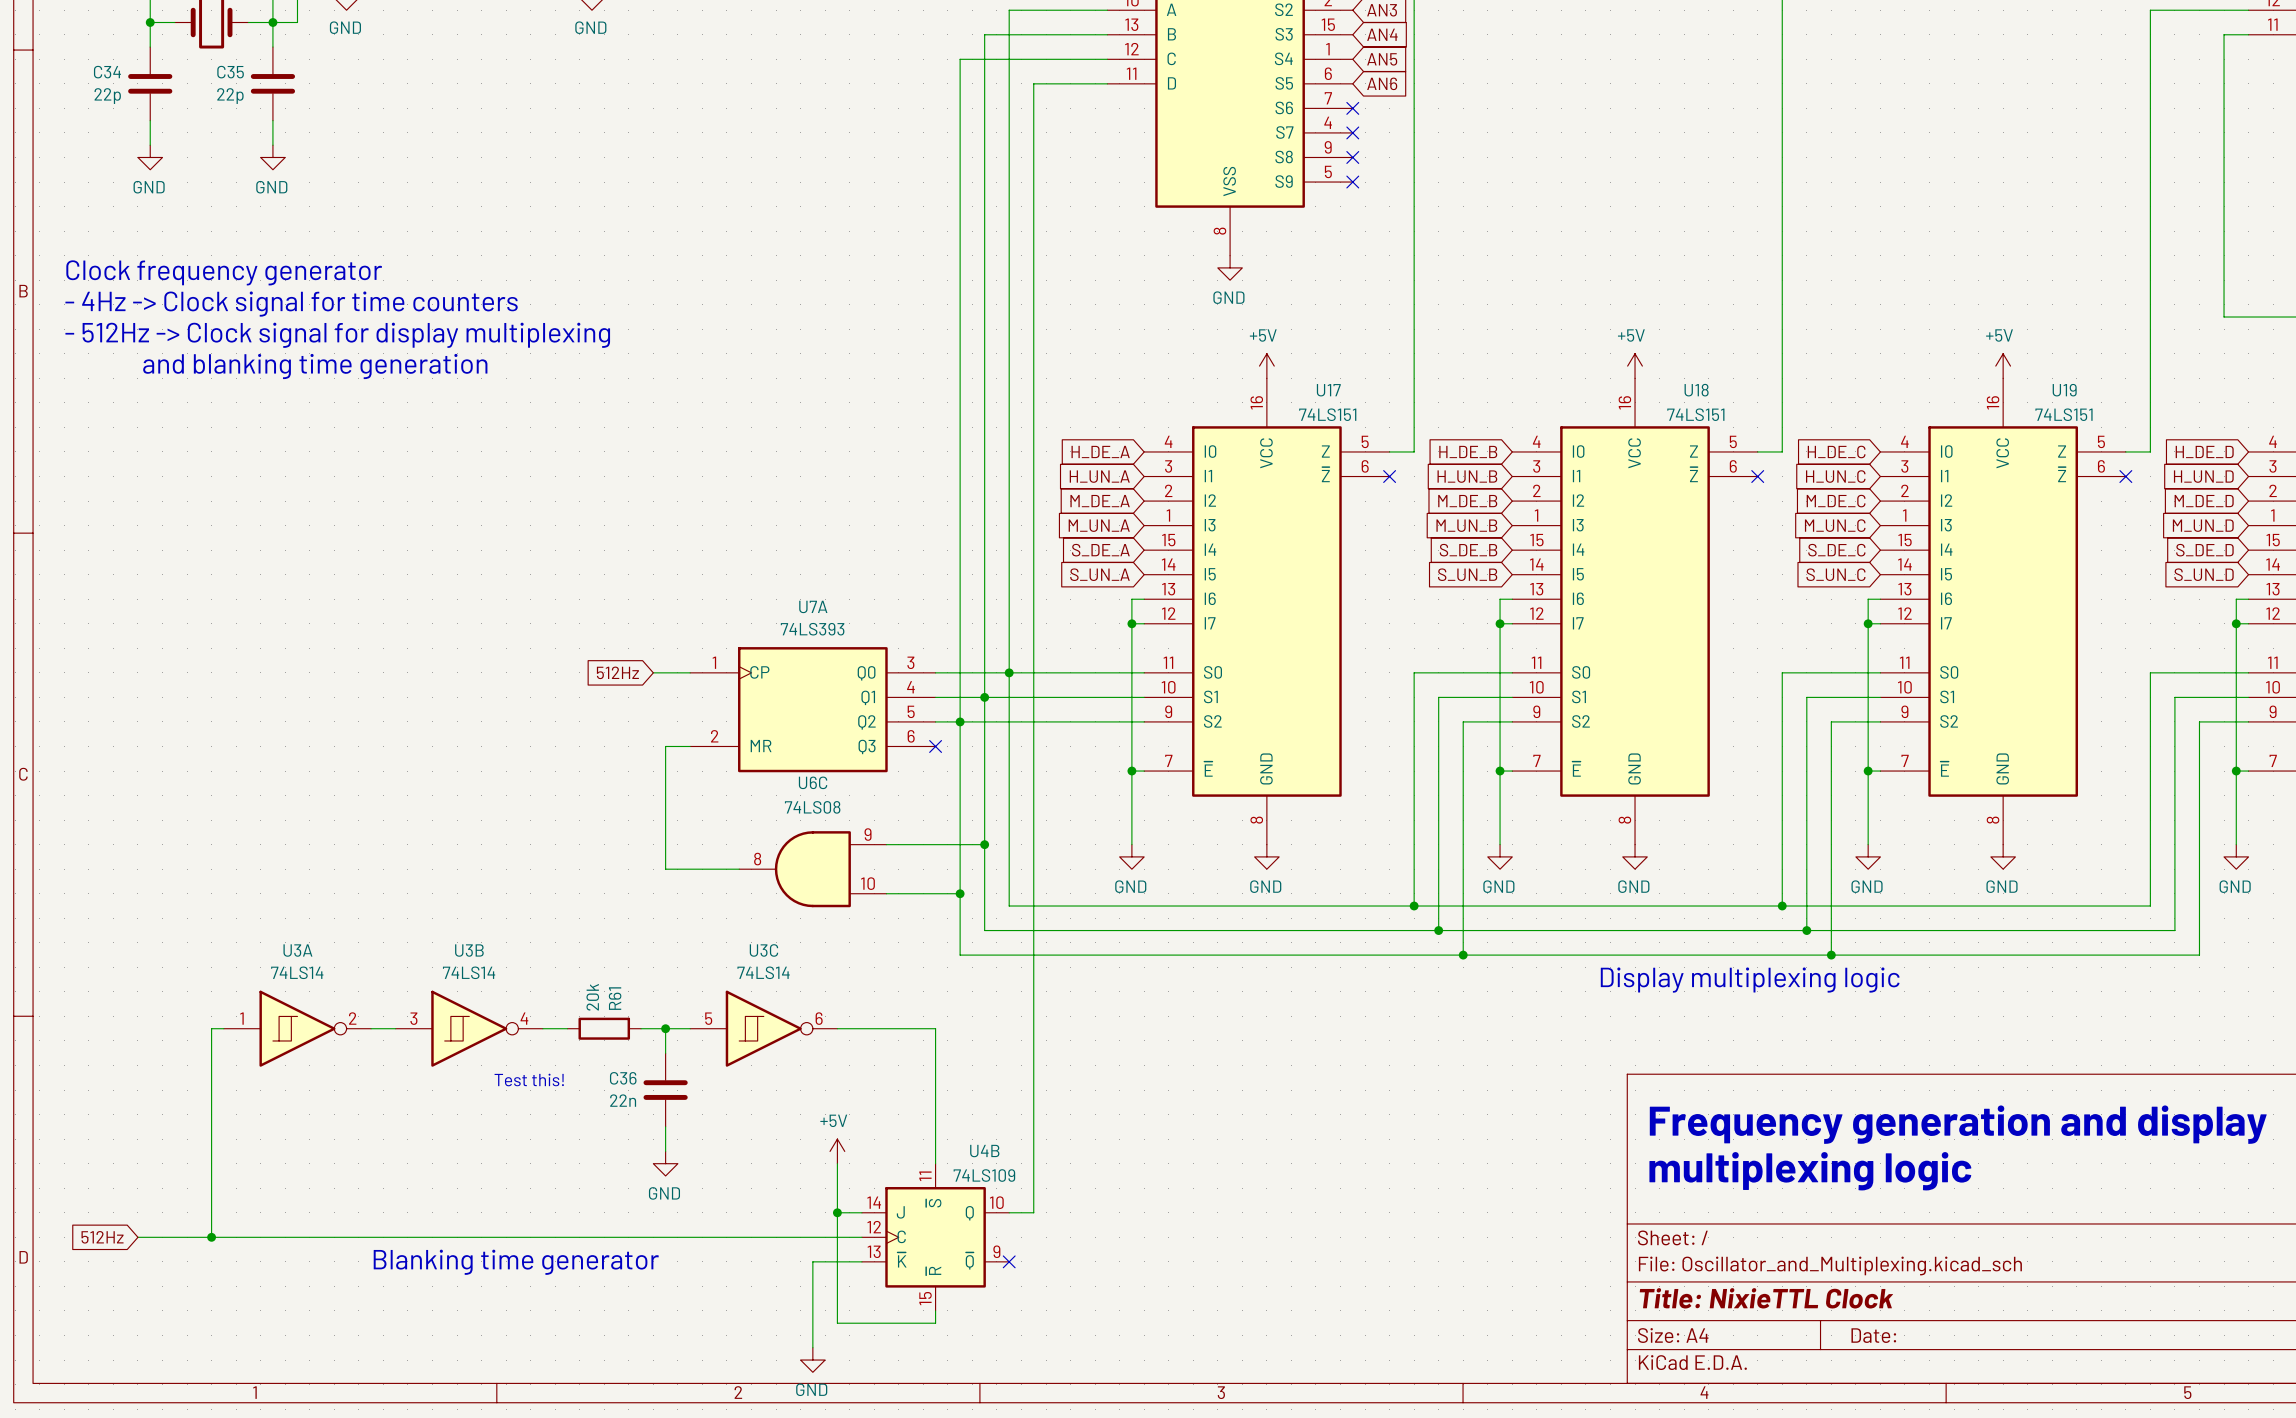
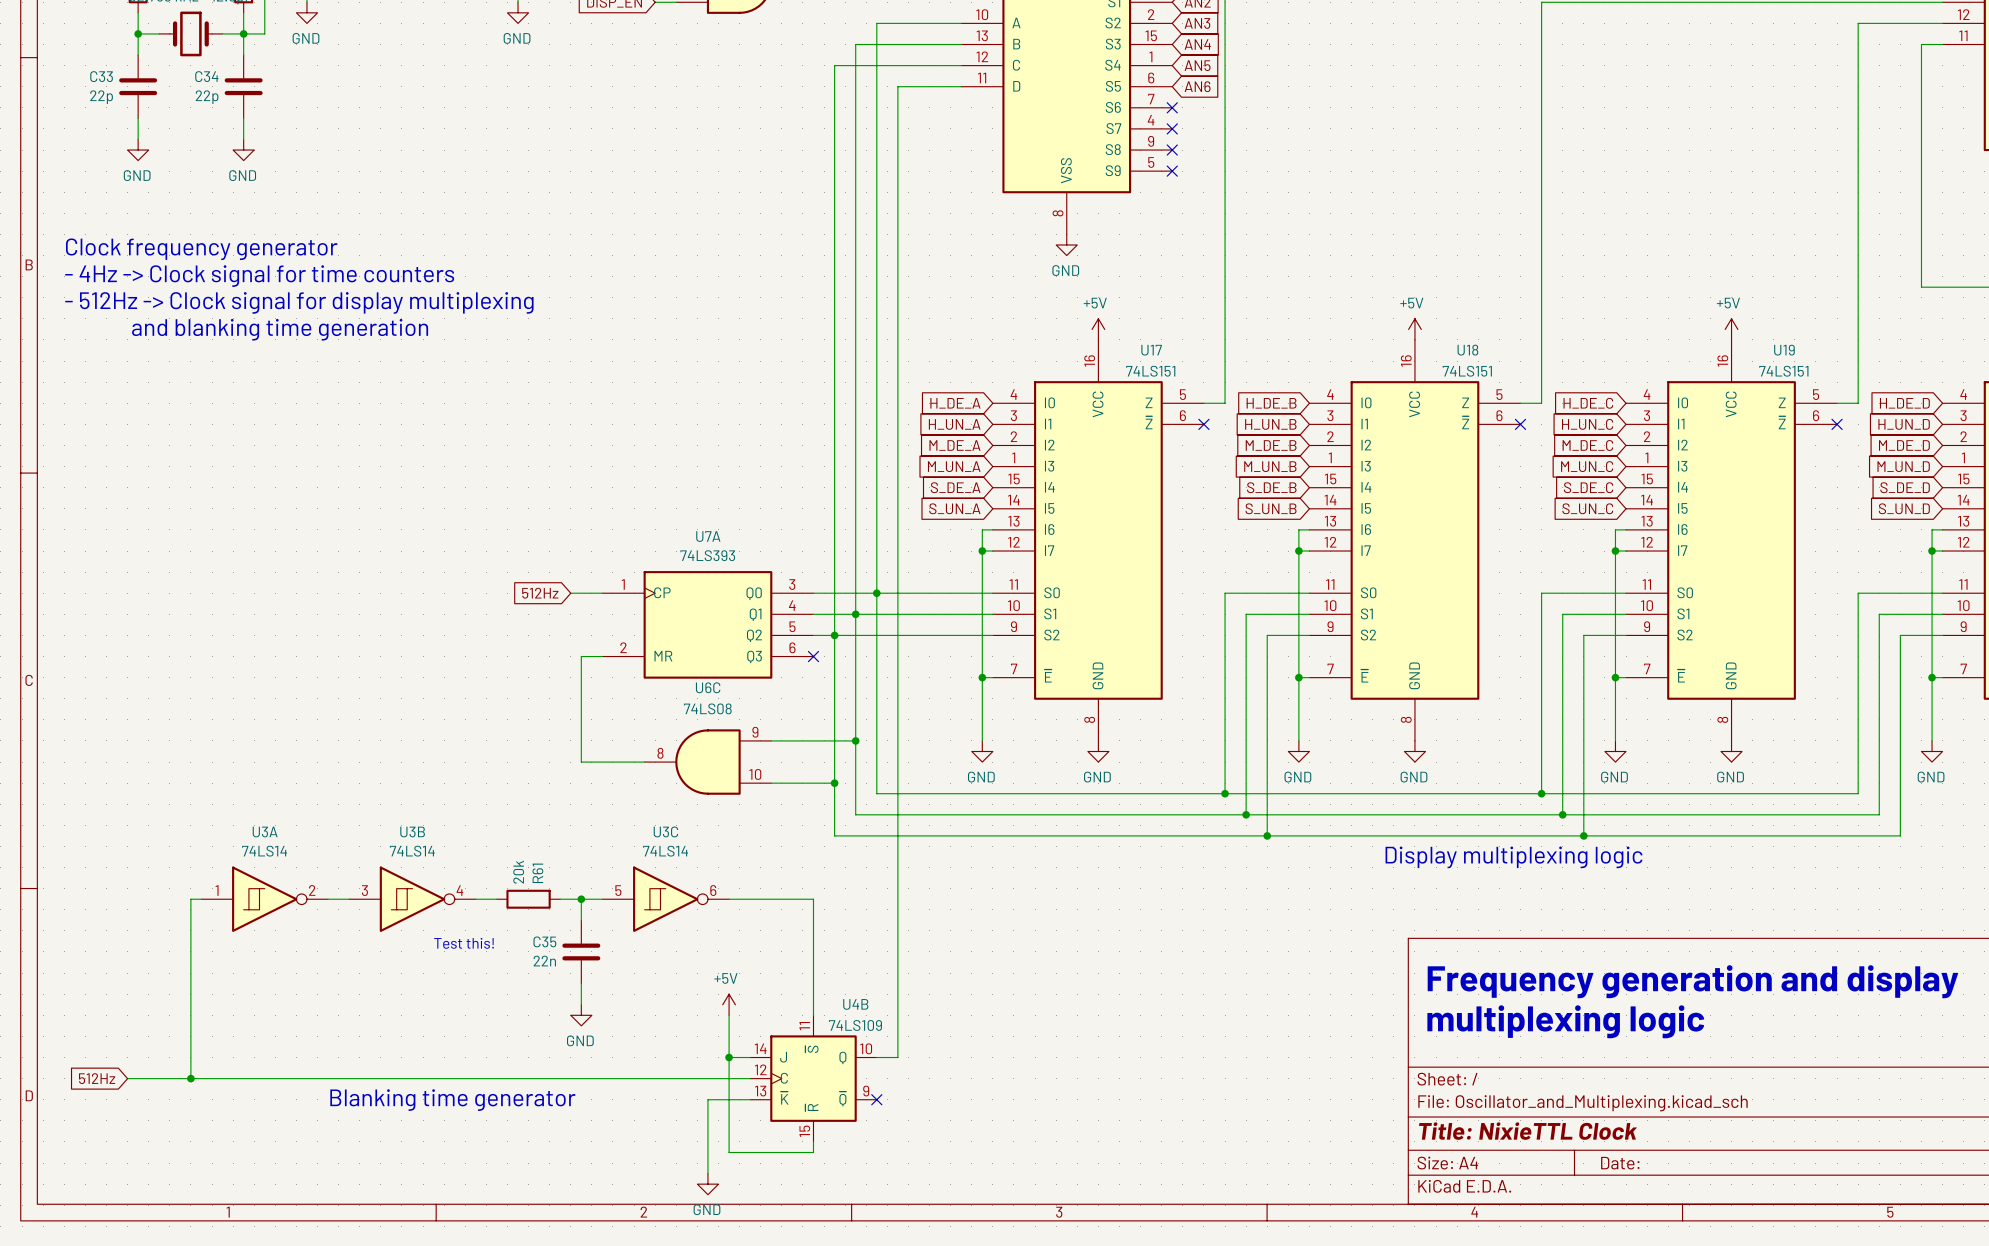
C34 name: C34 (107, 72) -> C33 (101, 76)
C35 name: C35 (230, 72) -> C34 (206, 76)
C36 name: C36 (623, 1078) -> C35 (544, 941)

